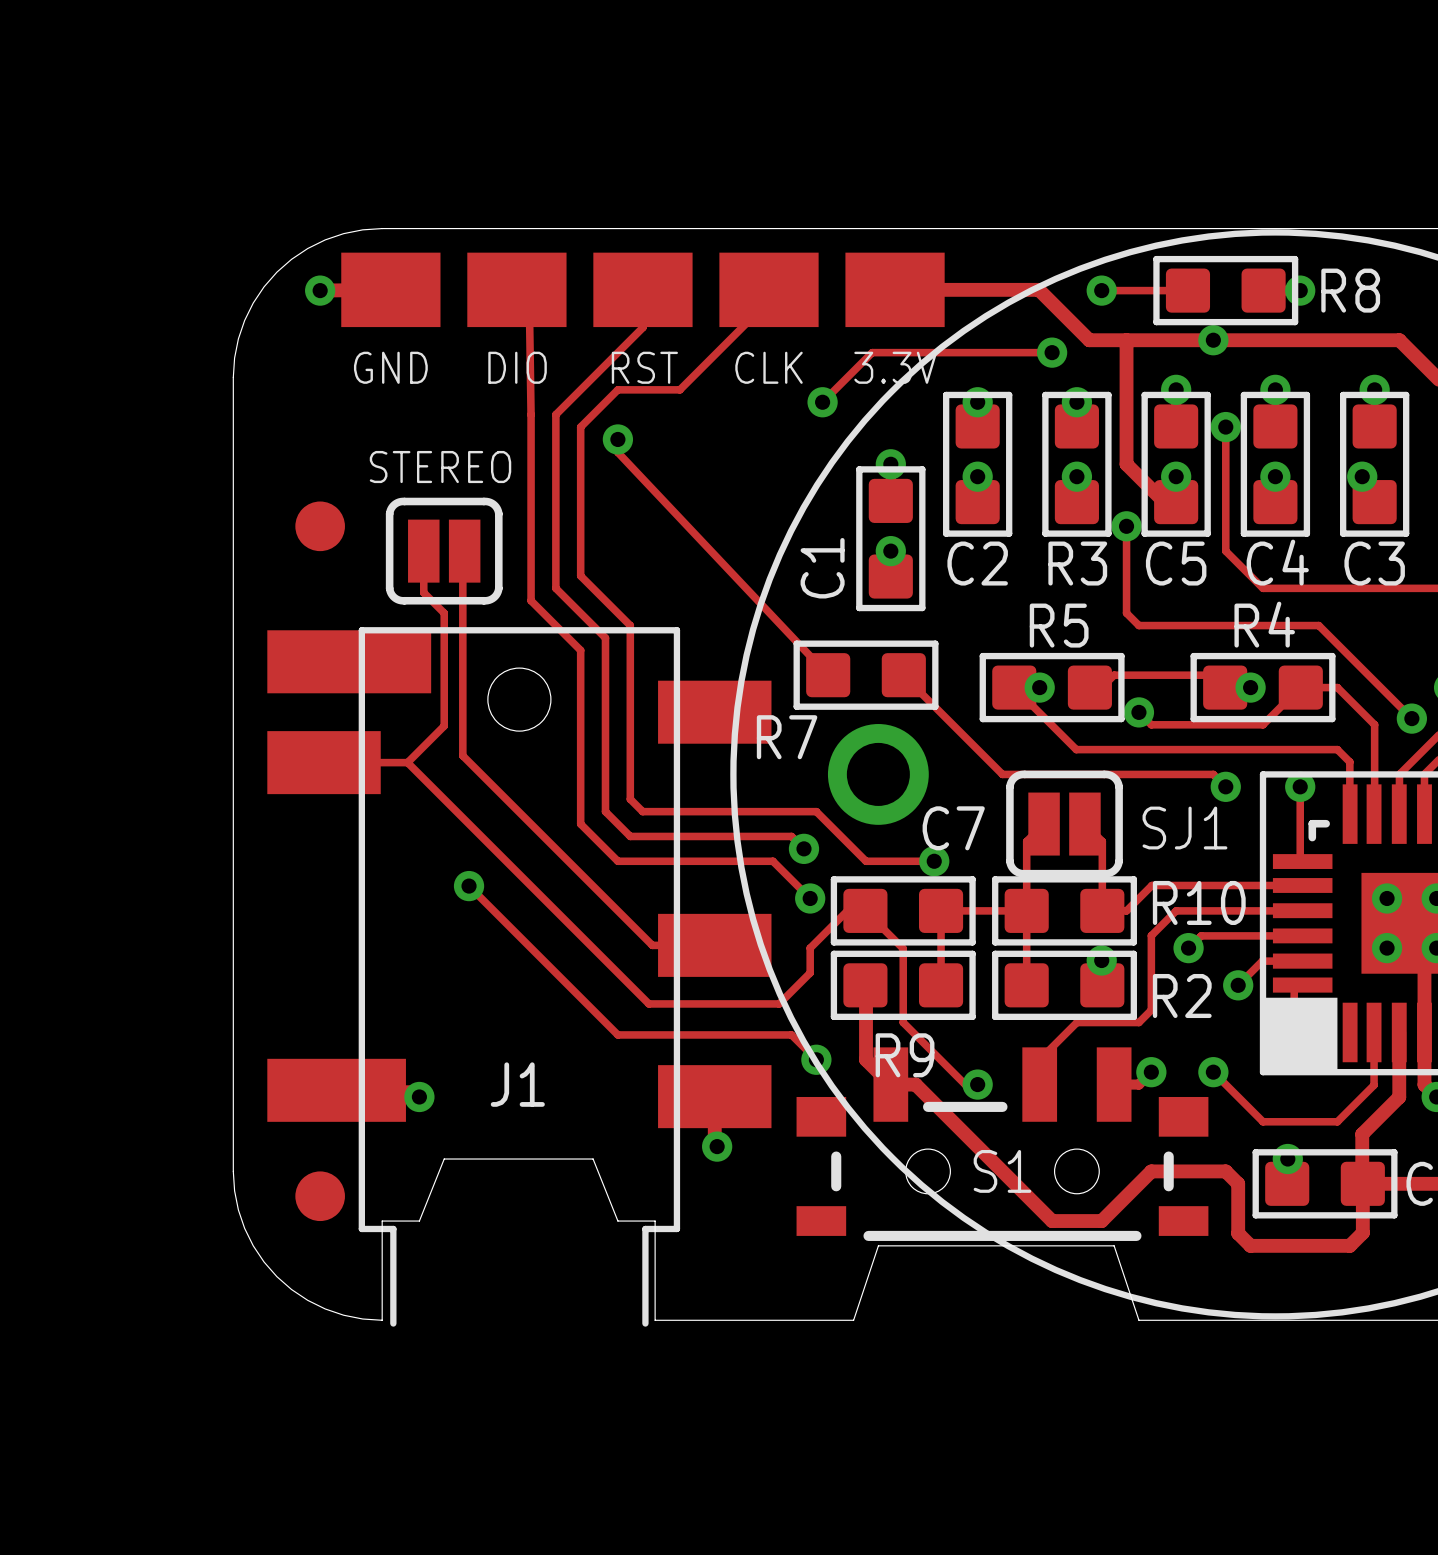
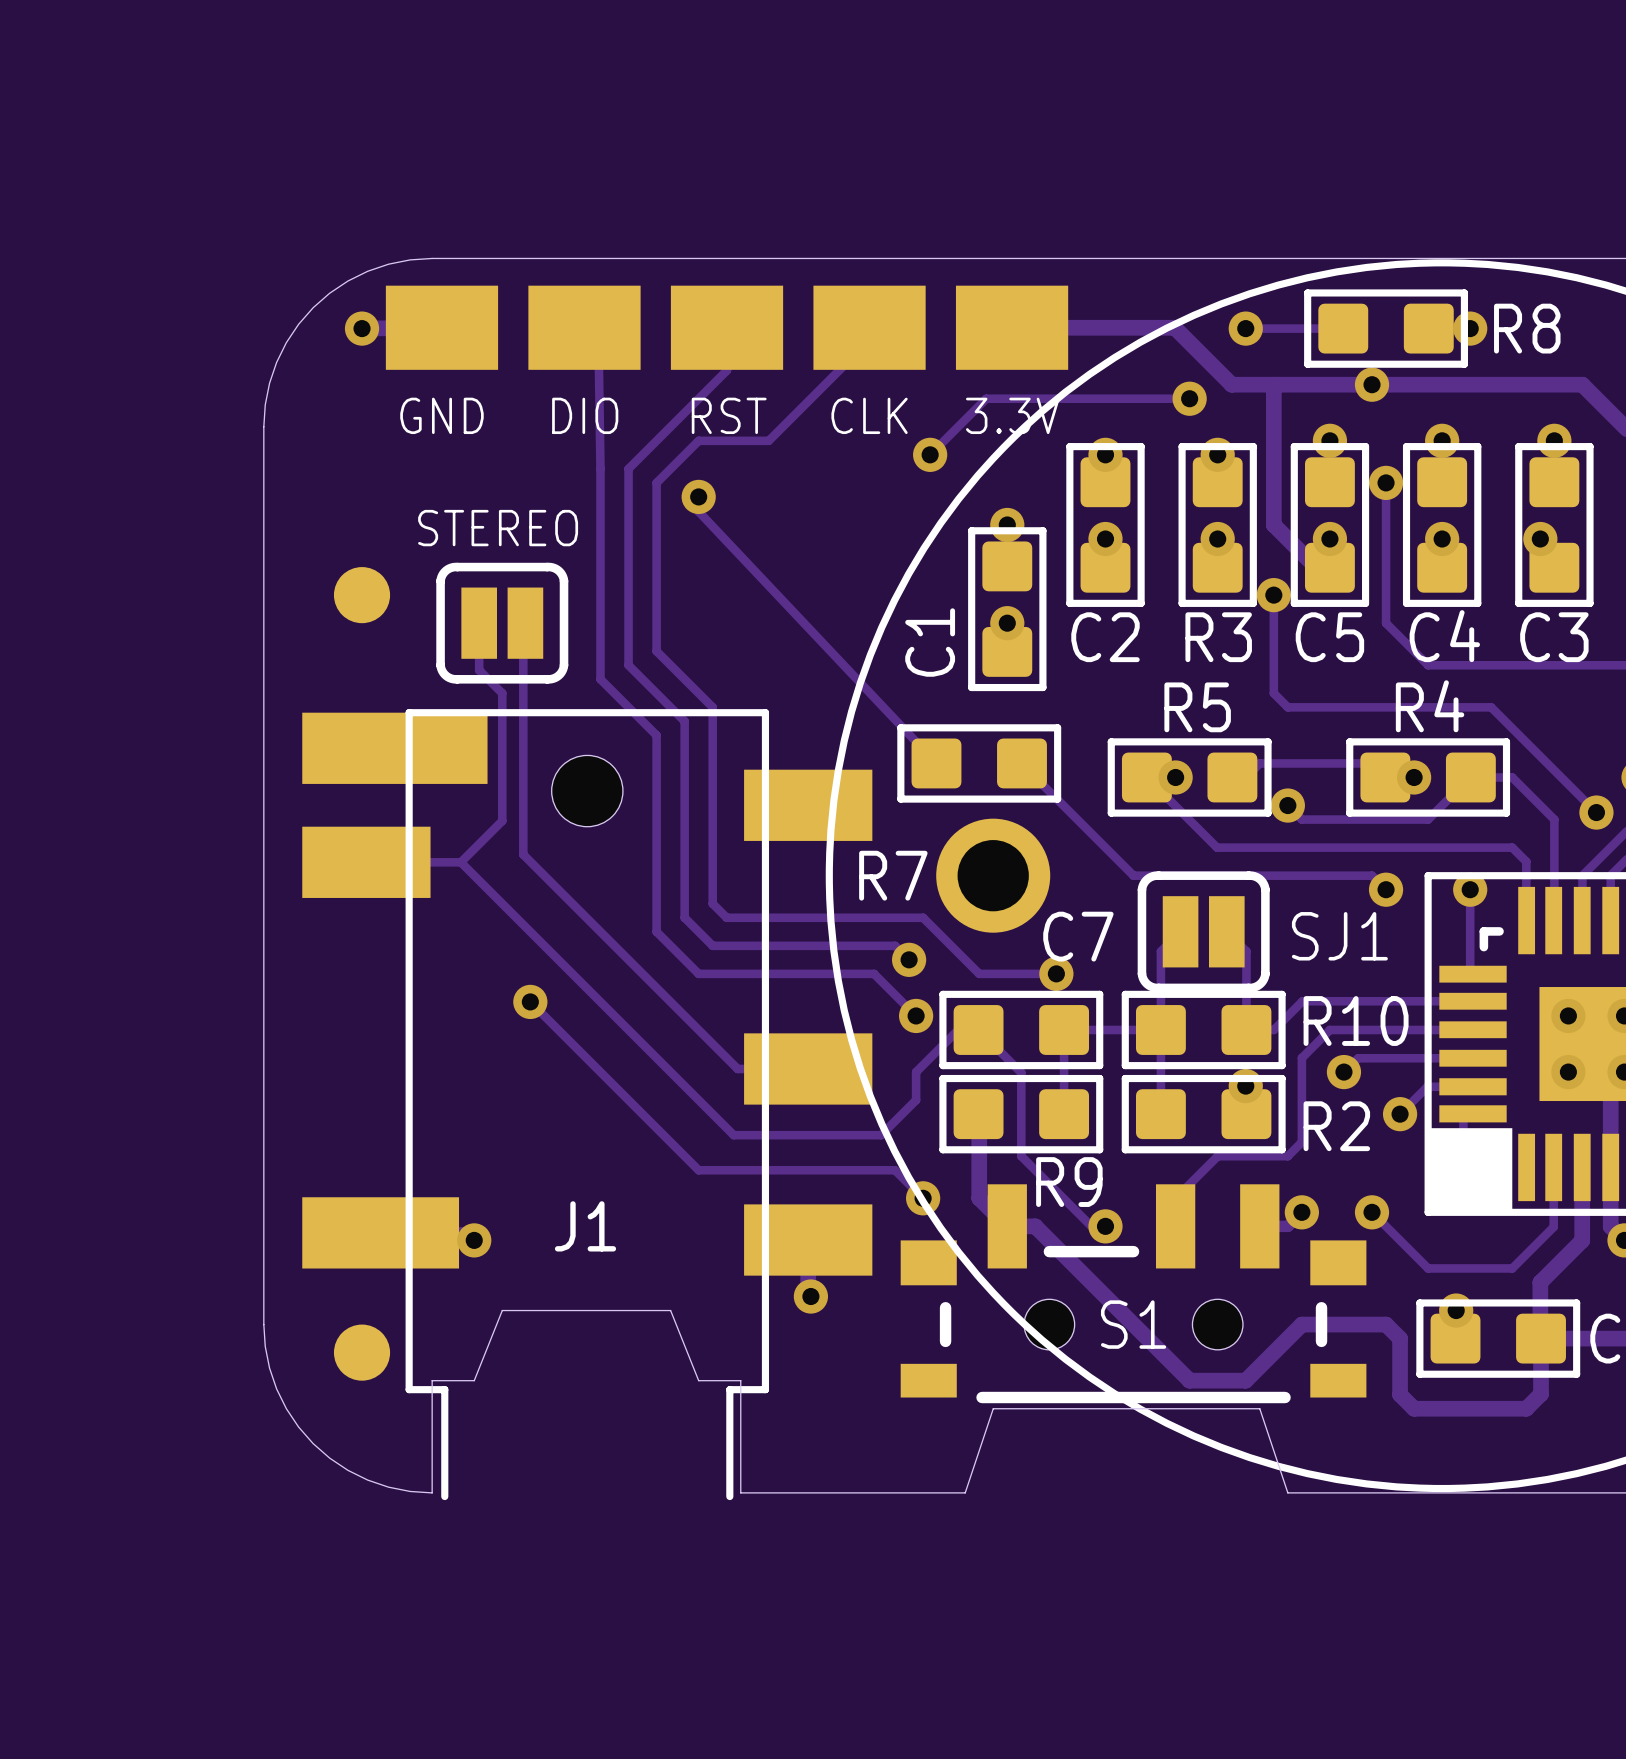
R7 name position: R7 (787, 737) -> R7 (893, 875)
R9 name position: R9 (905, 1055) -> R9 (1069, 1182)

